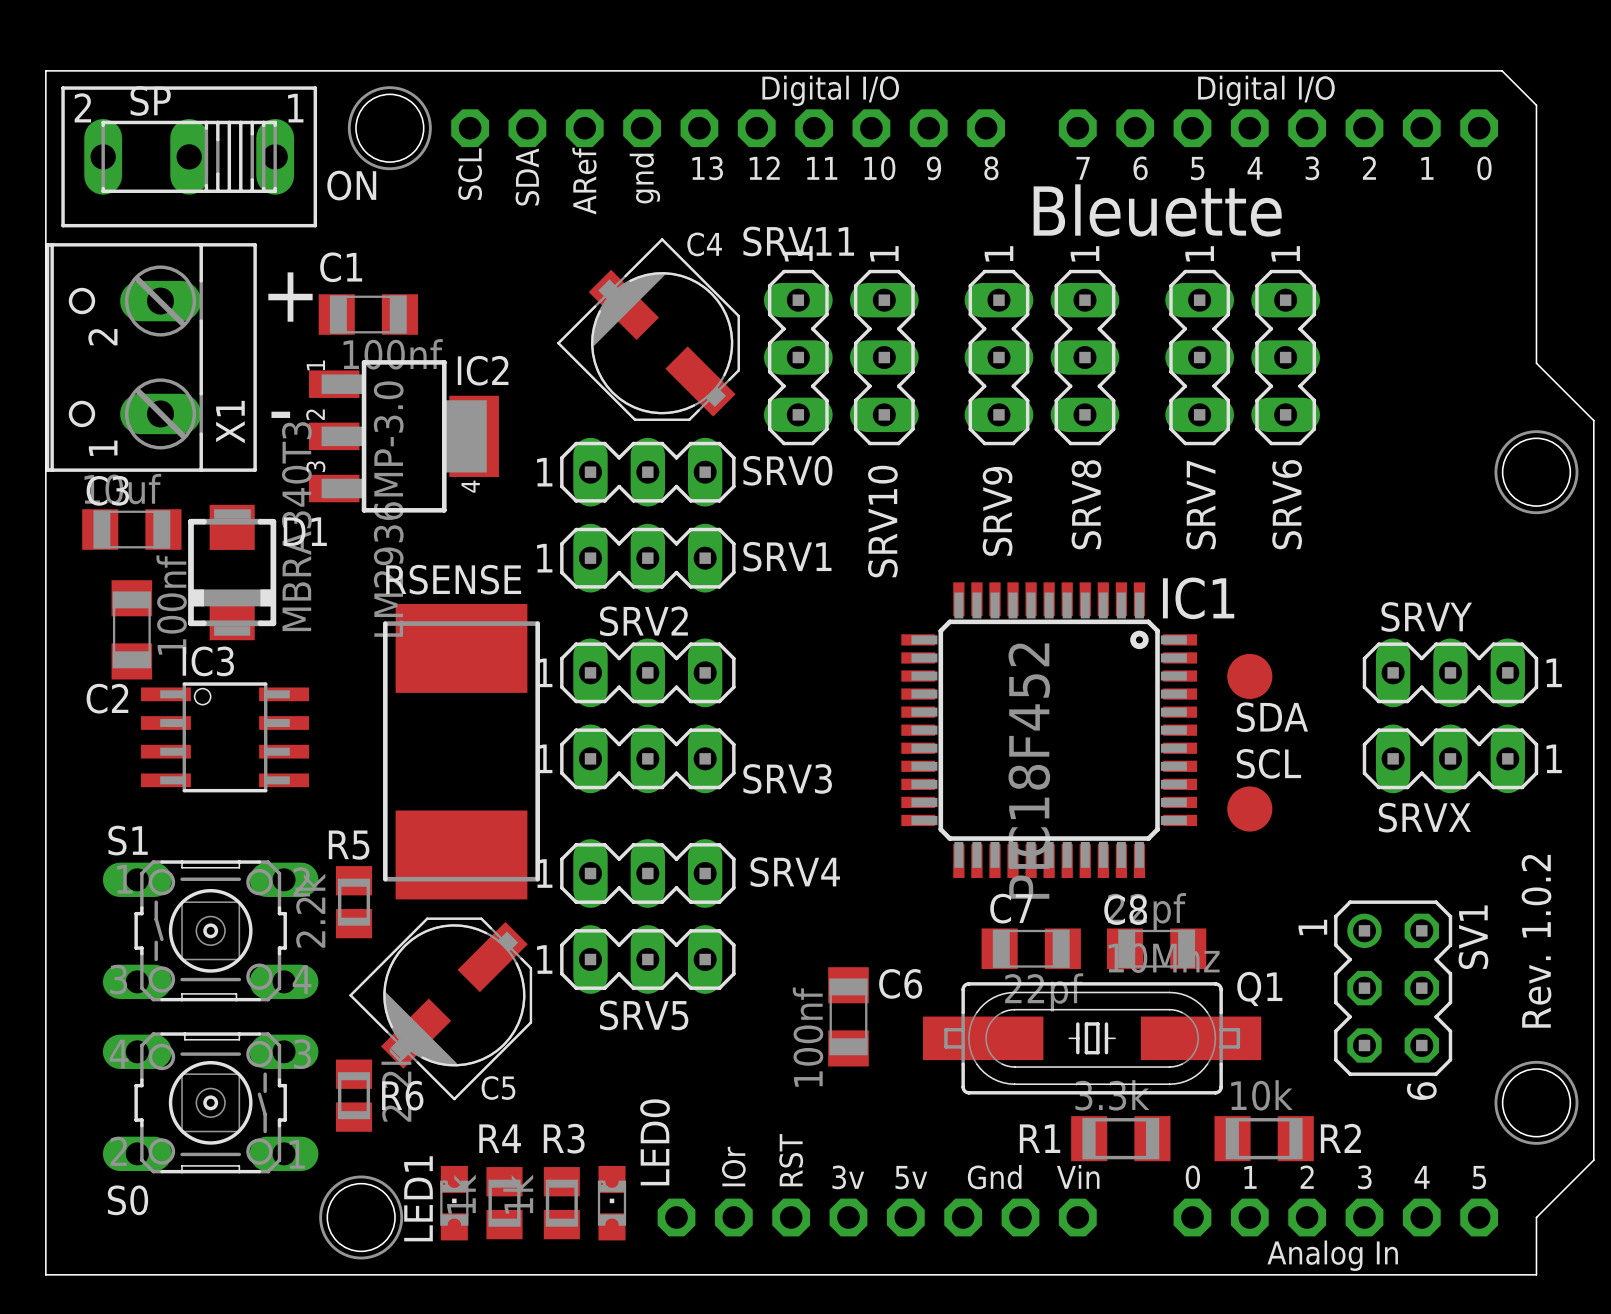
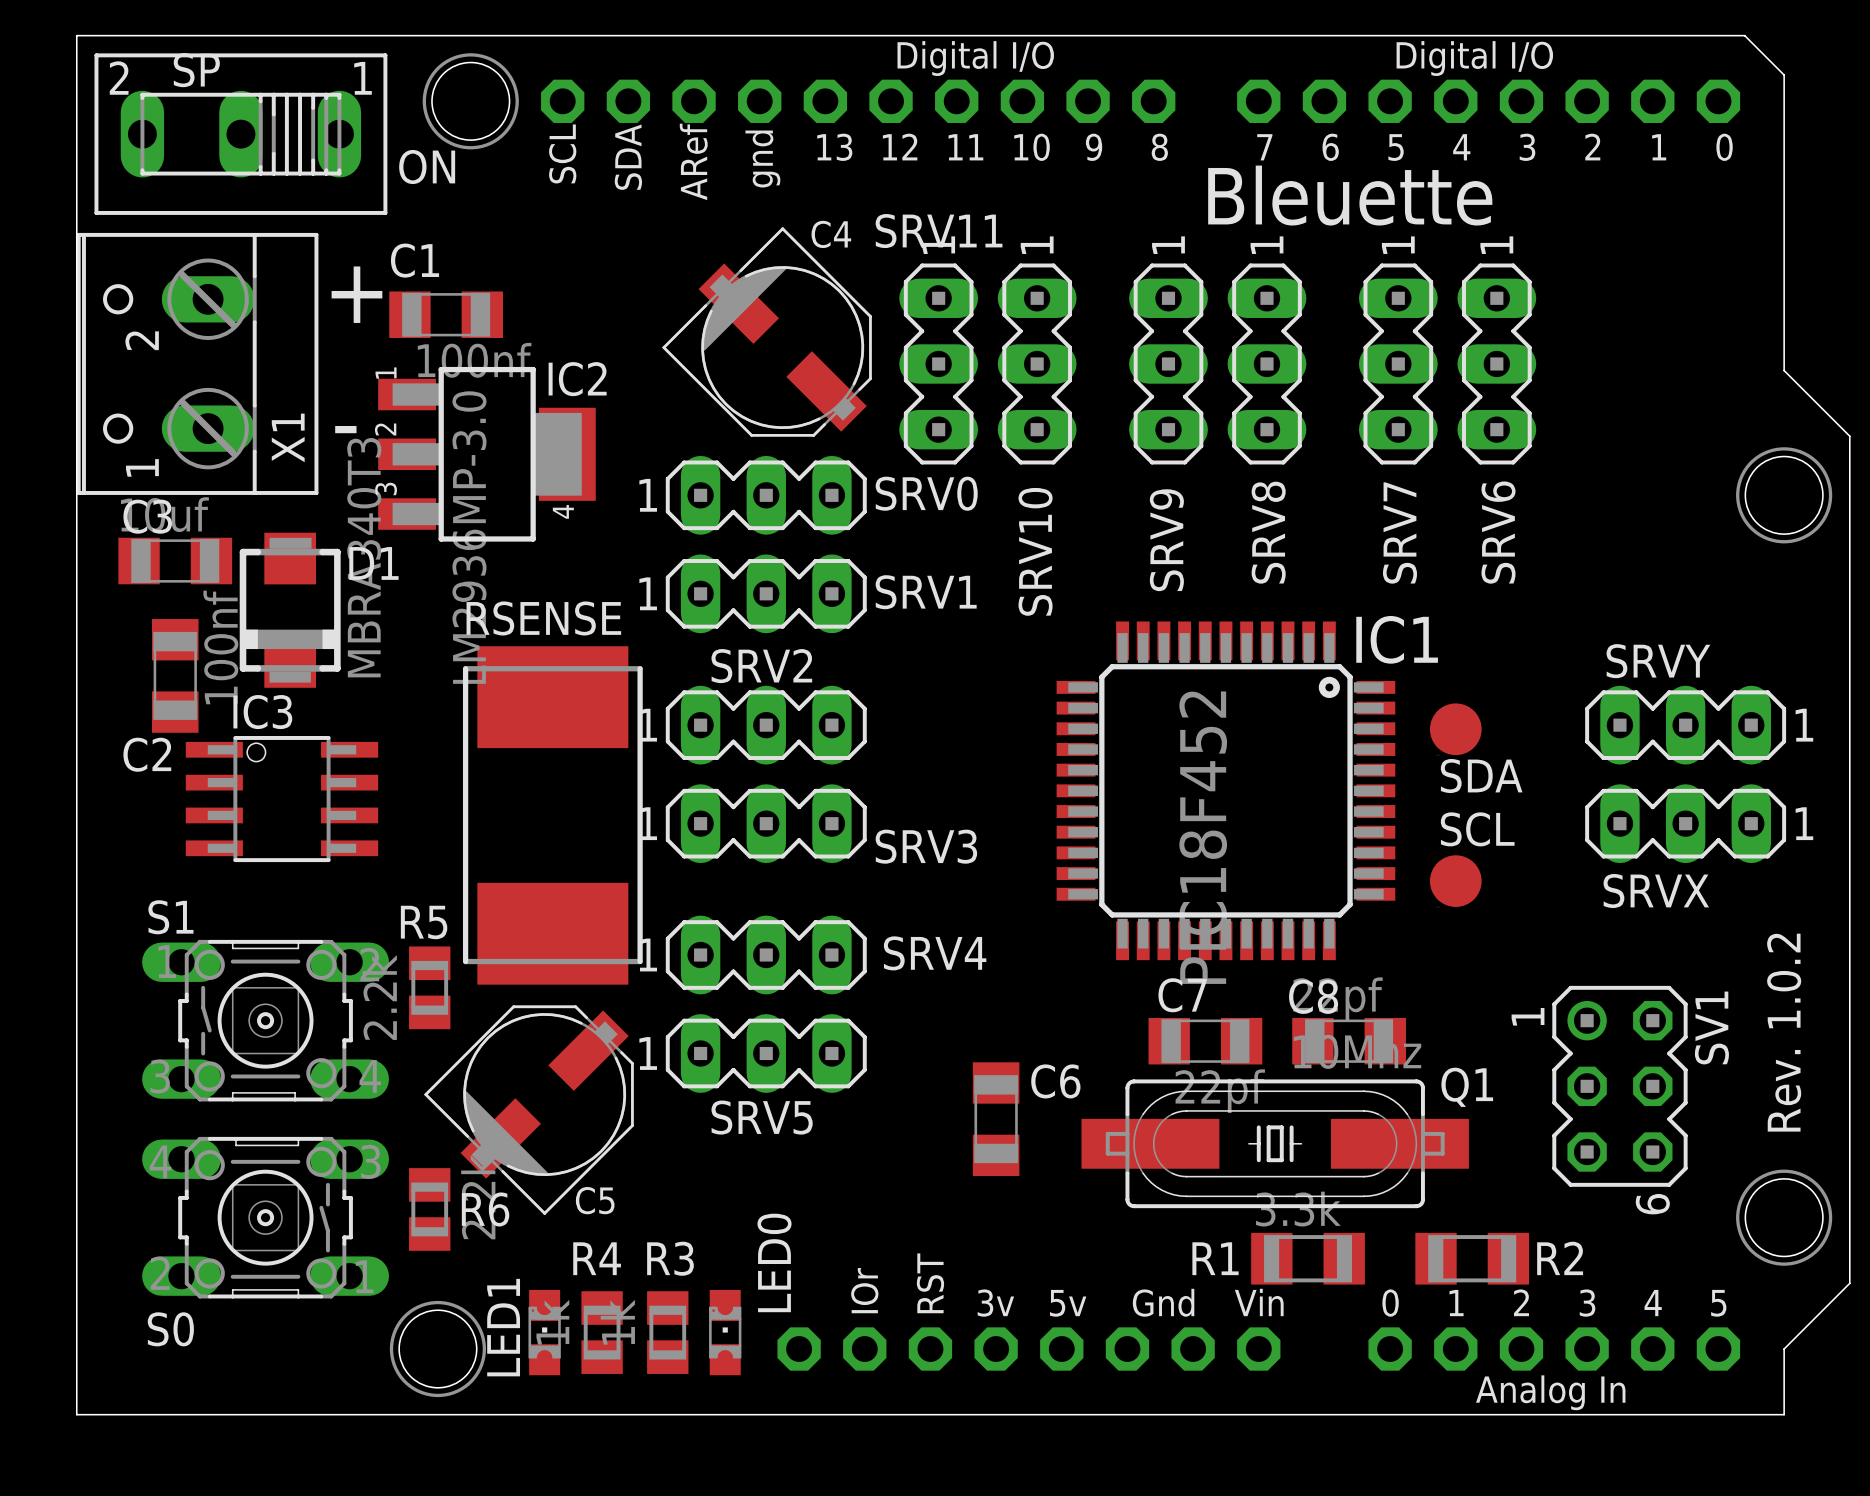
C6 value: 100nf (808, 1037) -> none
R2 value: 10k (1261, 1095) -> none

